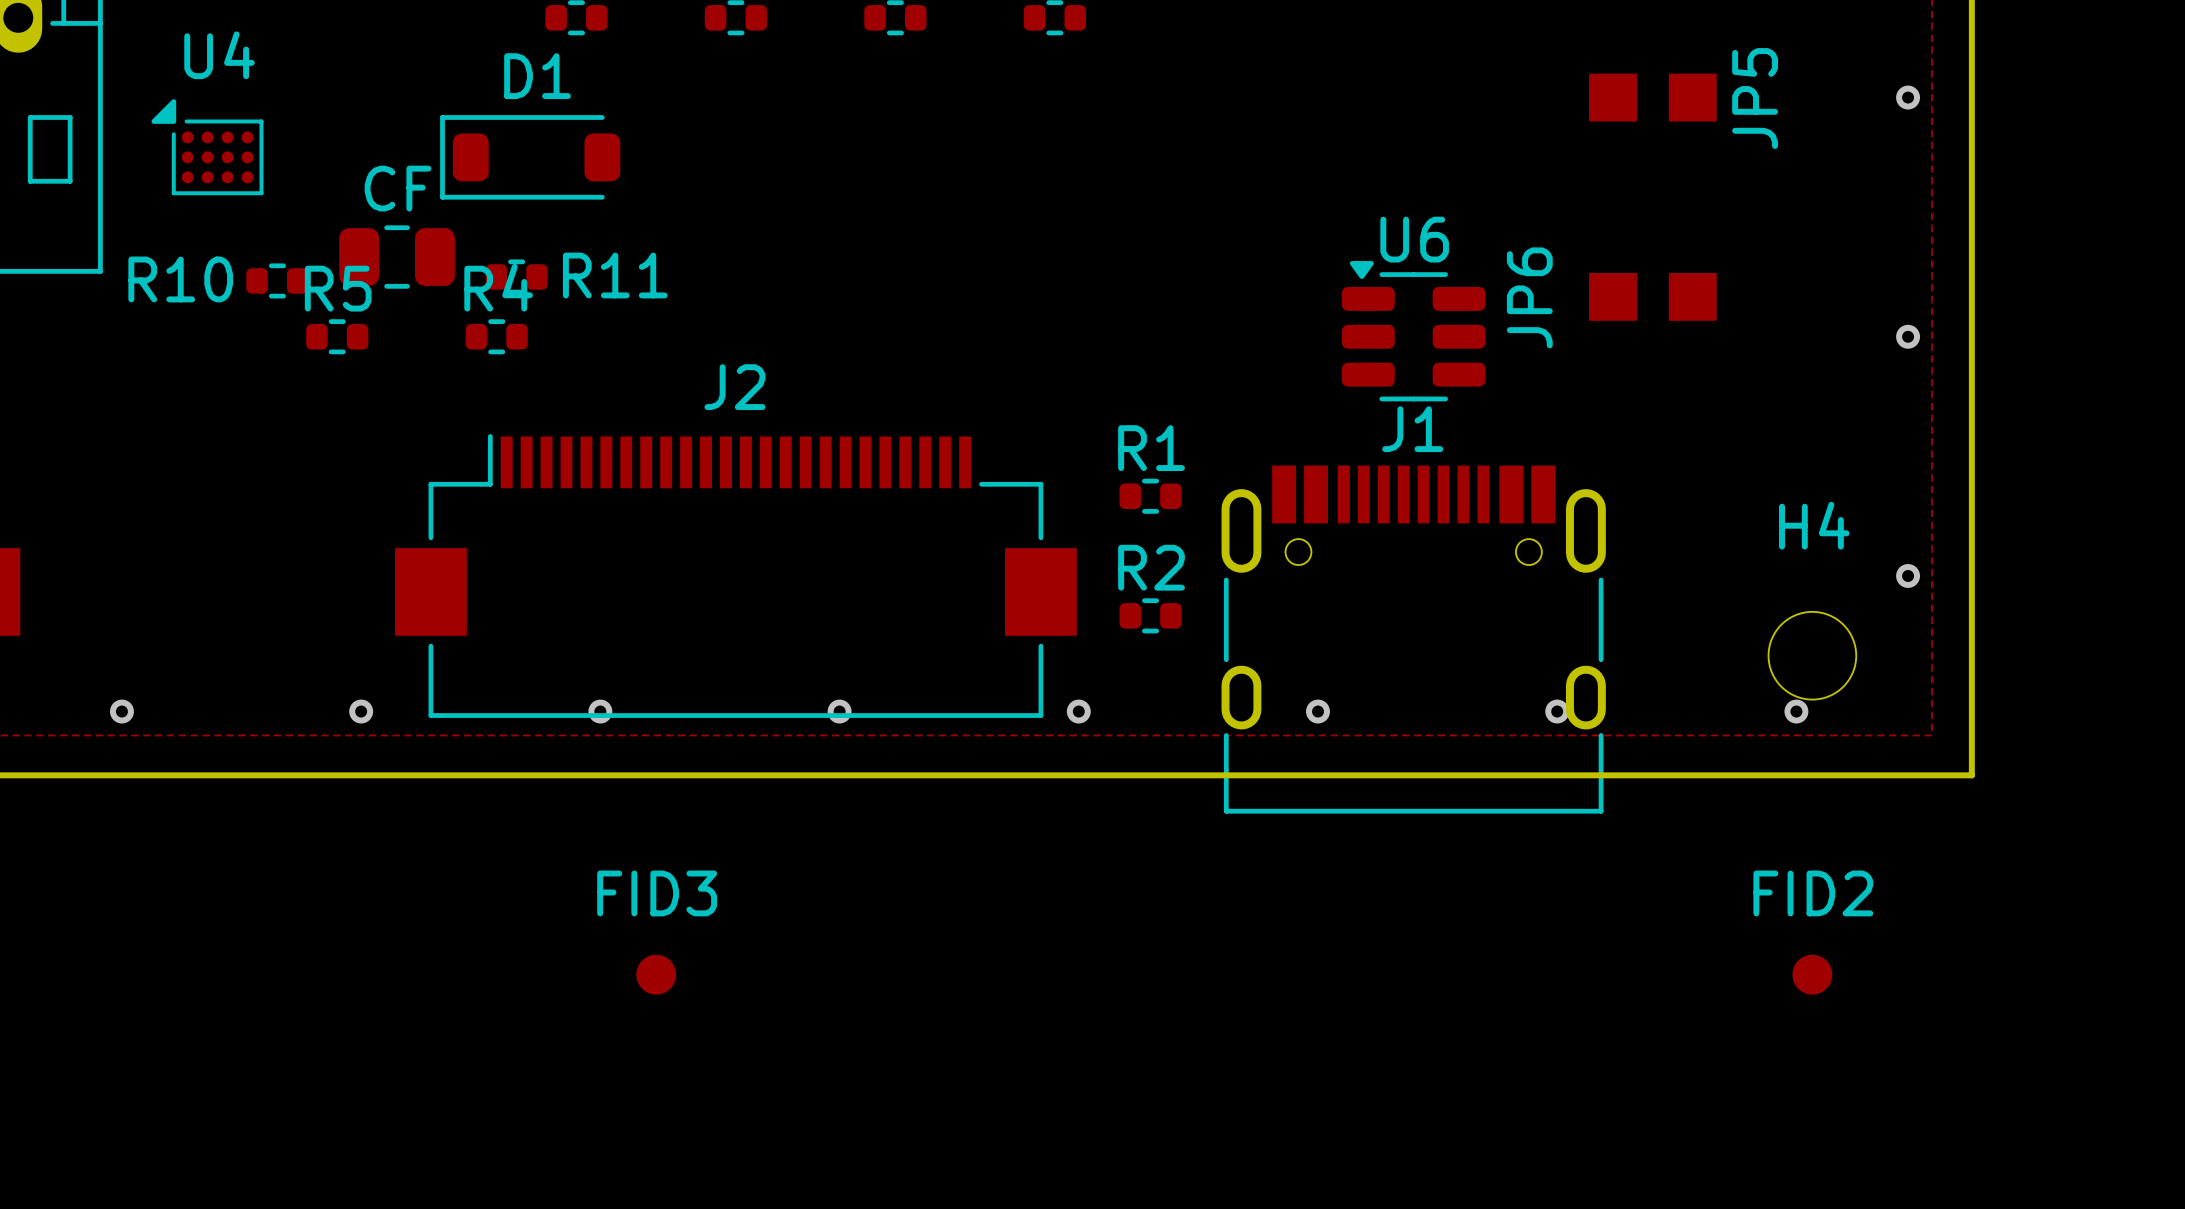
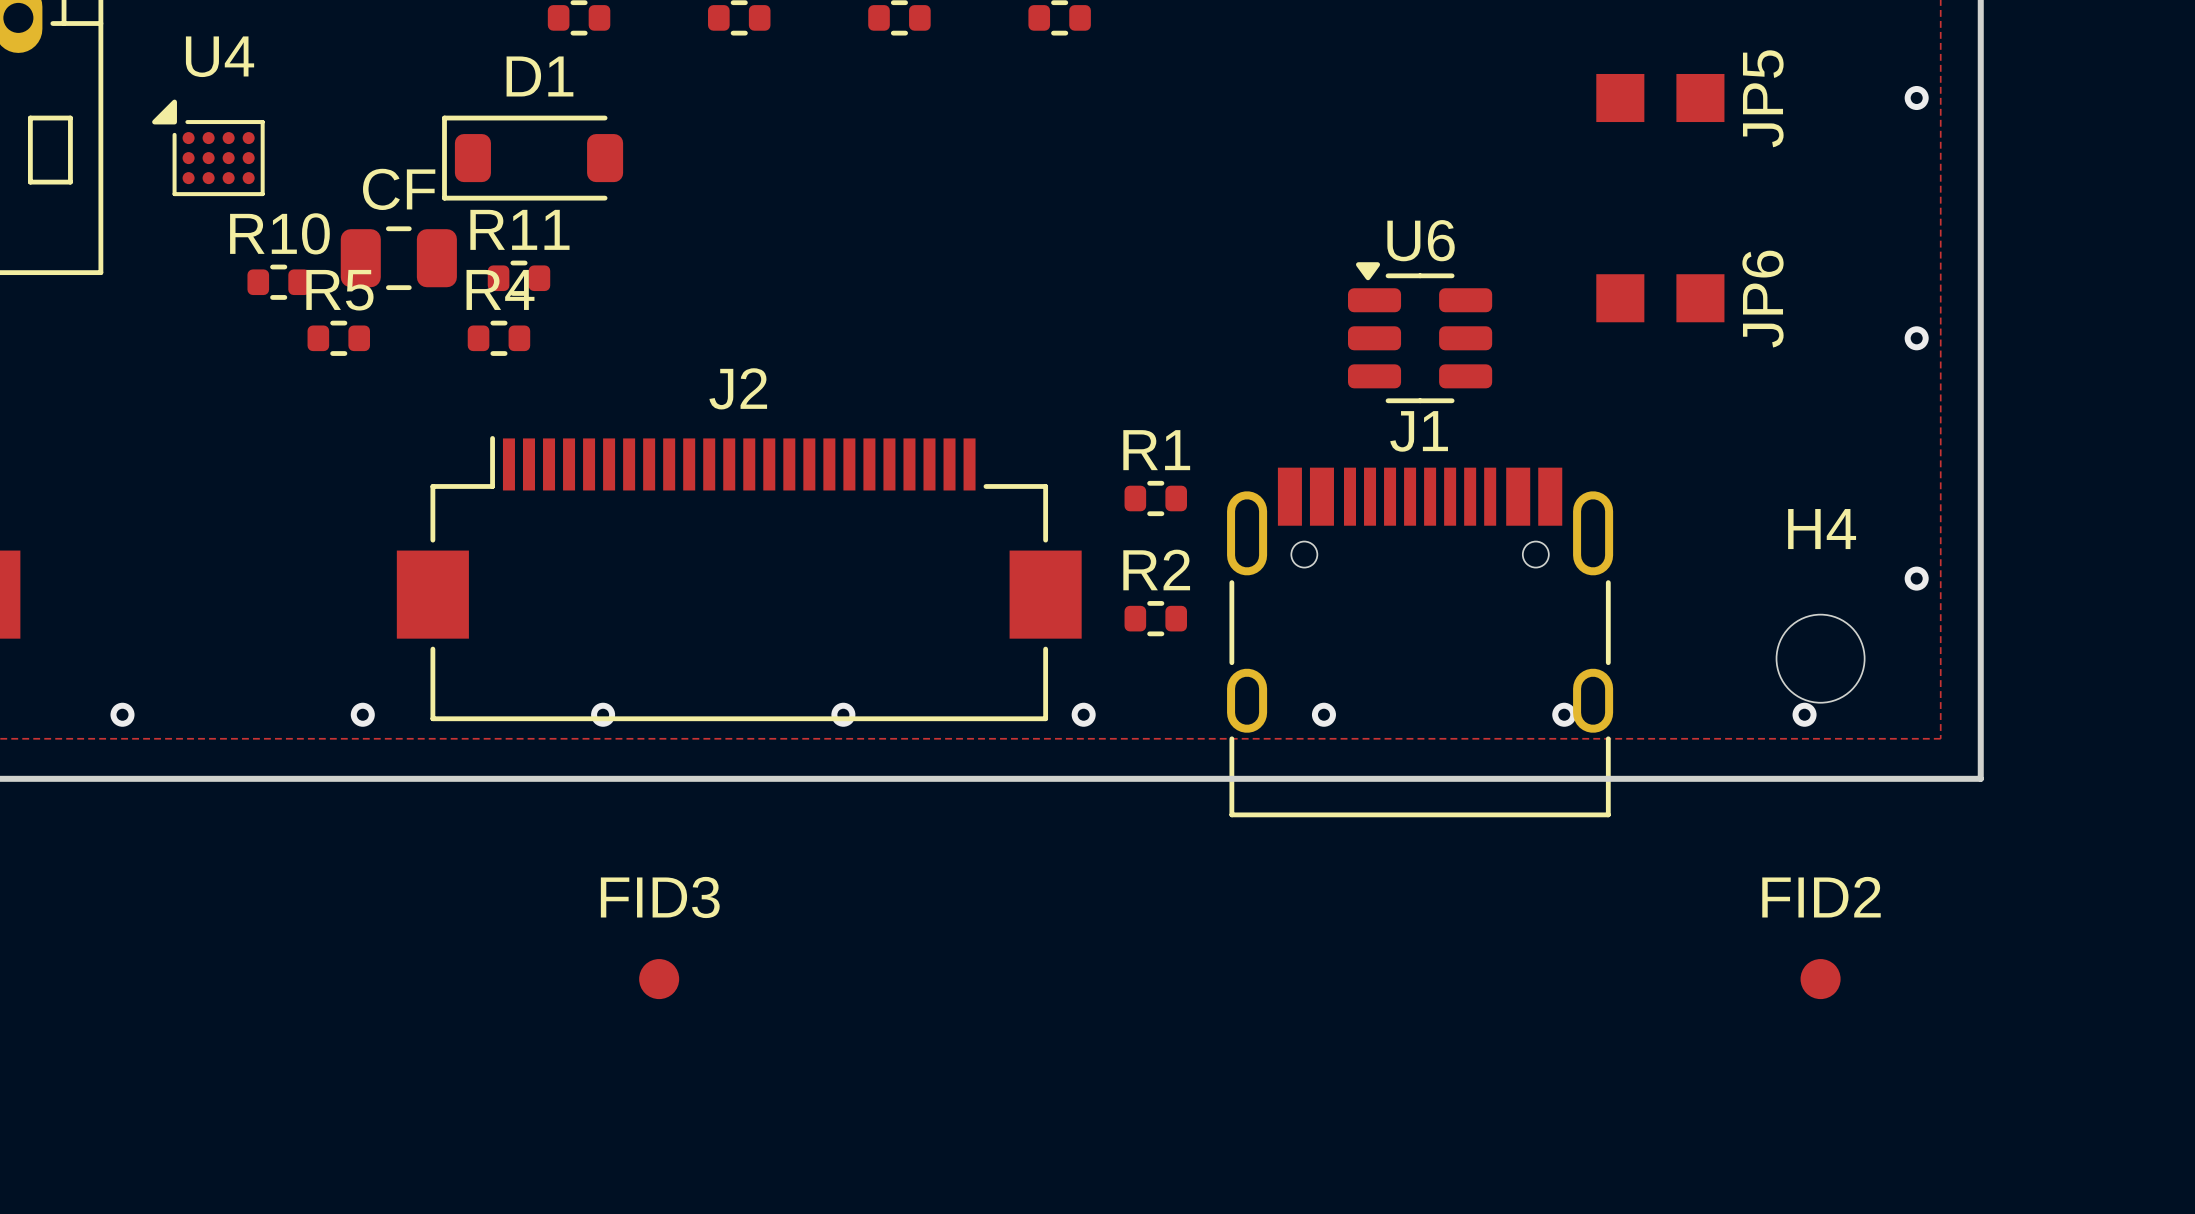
R11 name position: R11 (615, 275) -> R11 (519, 229)
R10 name position: R10 (180, 279) -> R10 (279, 233)
JP6 name position: JP6 (1529, 297) -> JP6 (1762, 299)

